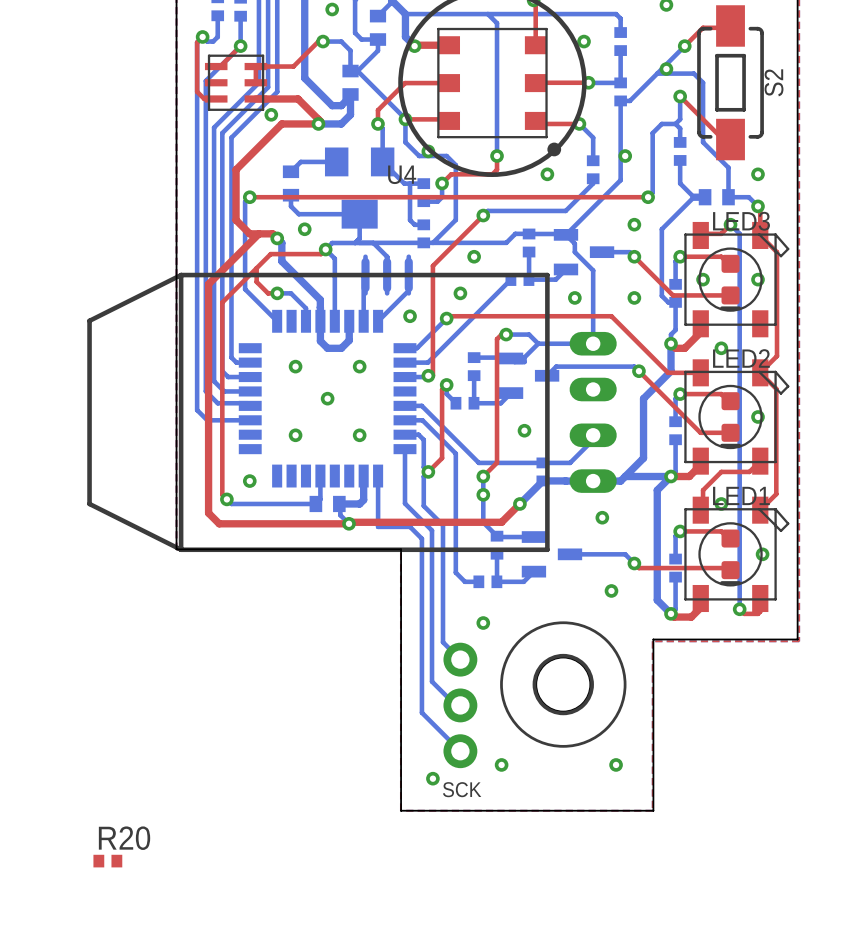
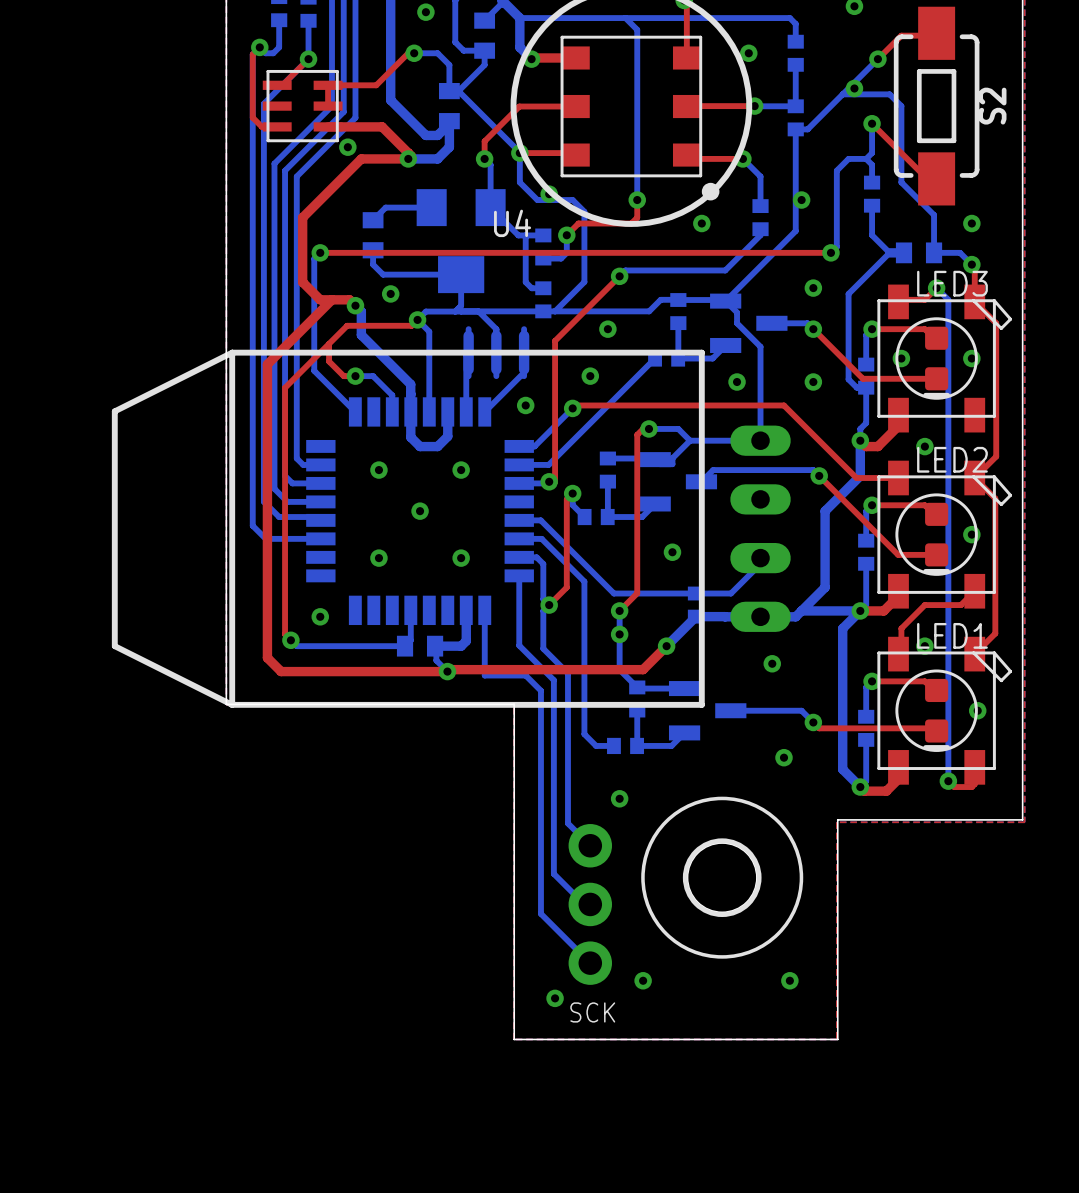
R20: (107, 861) -> none

